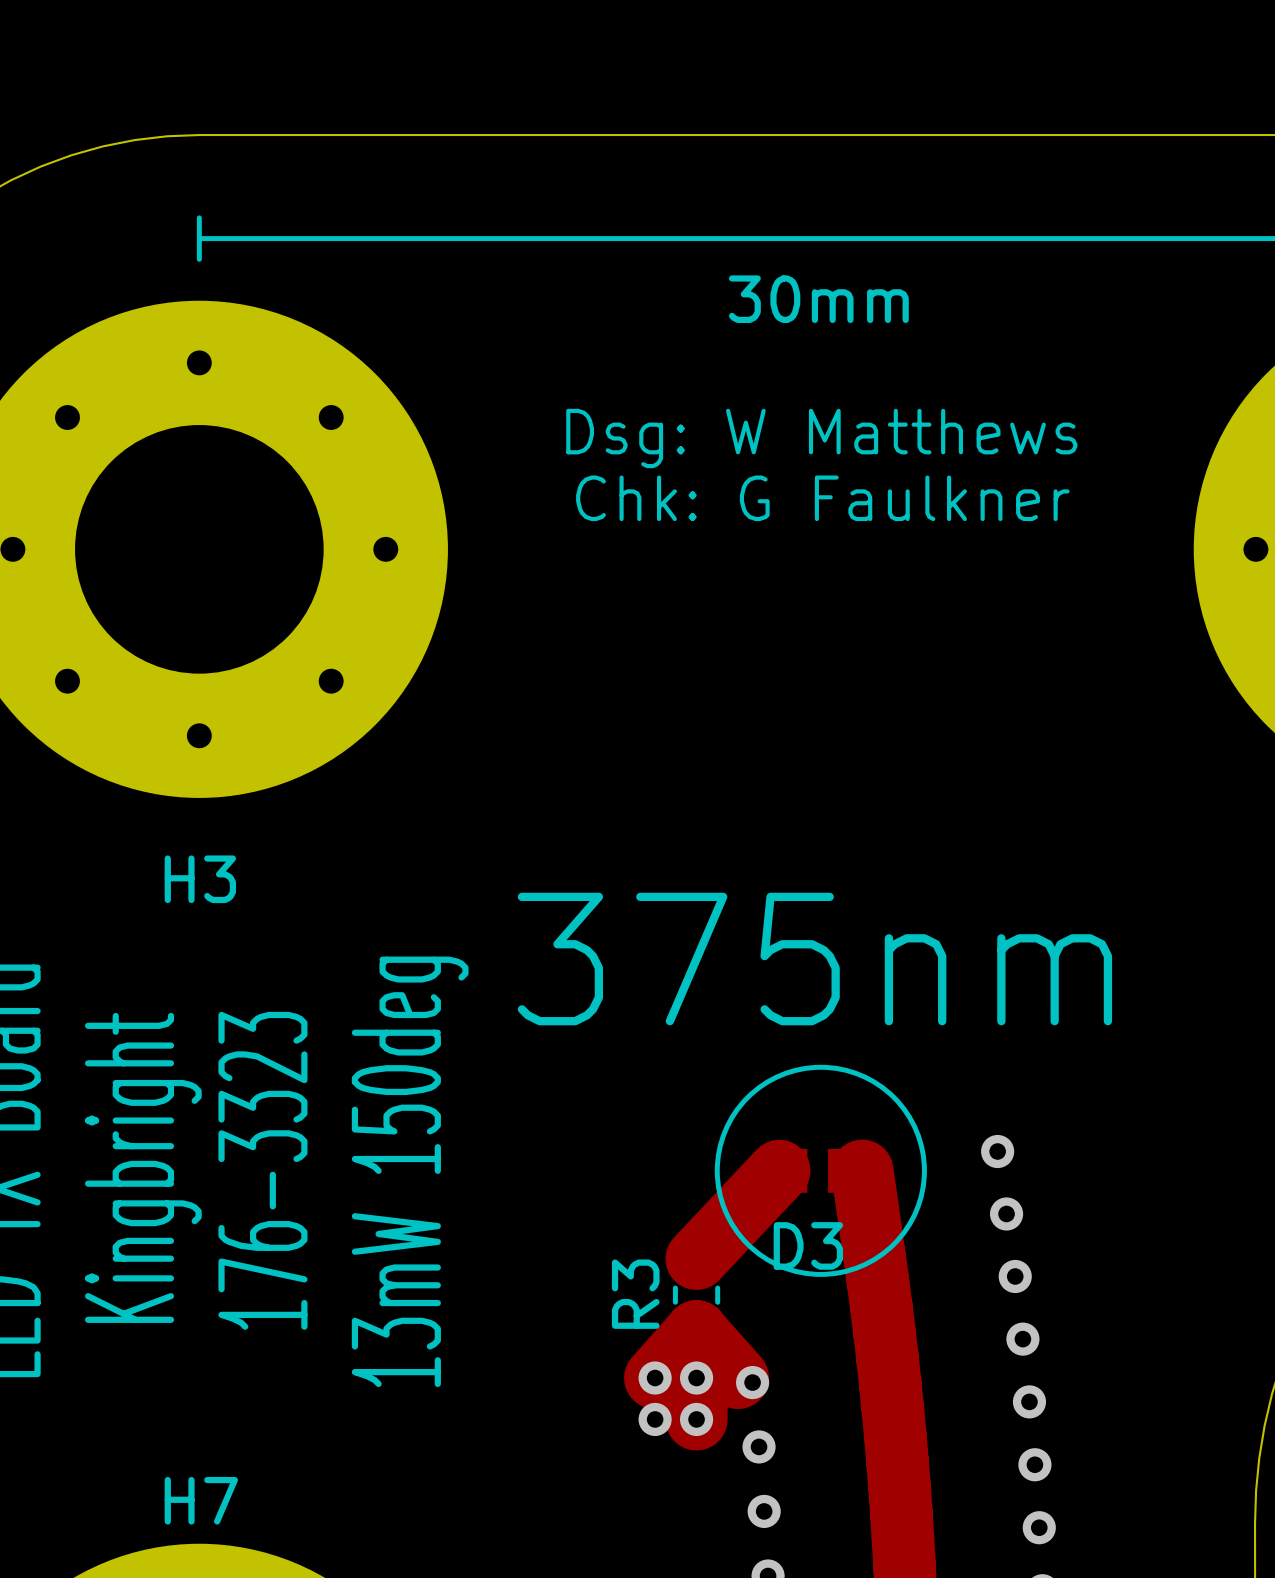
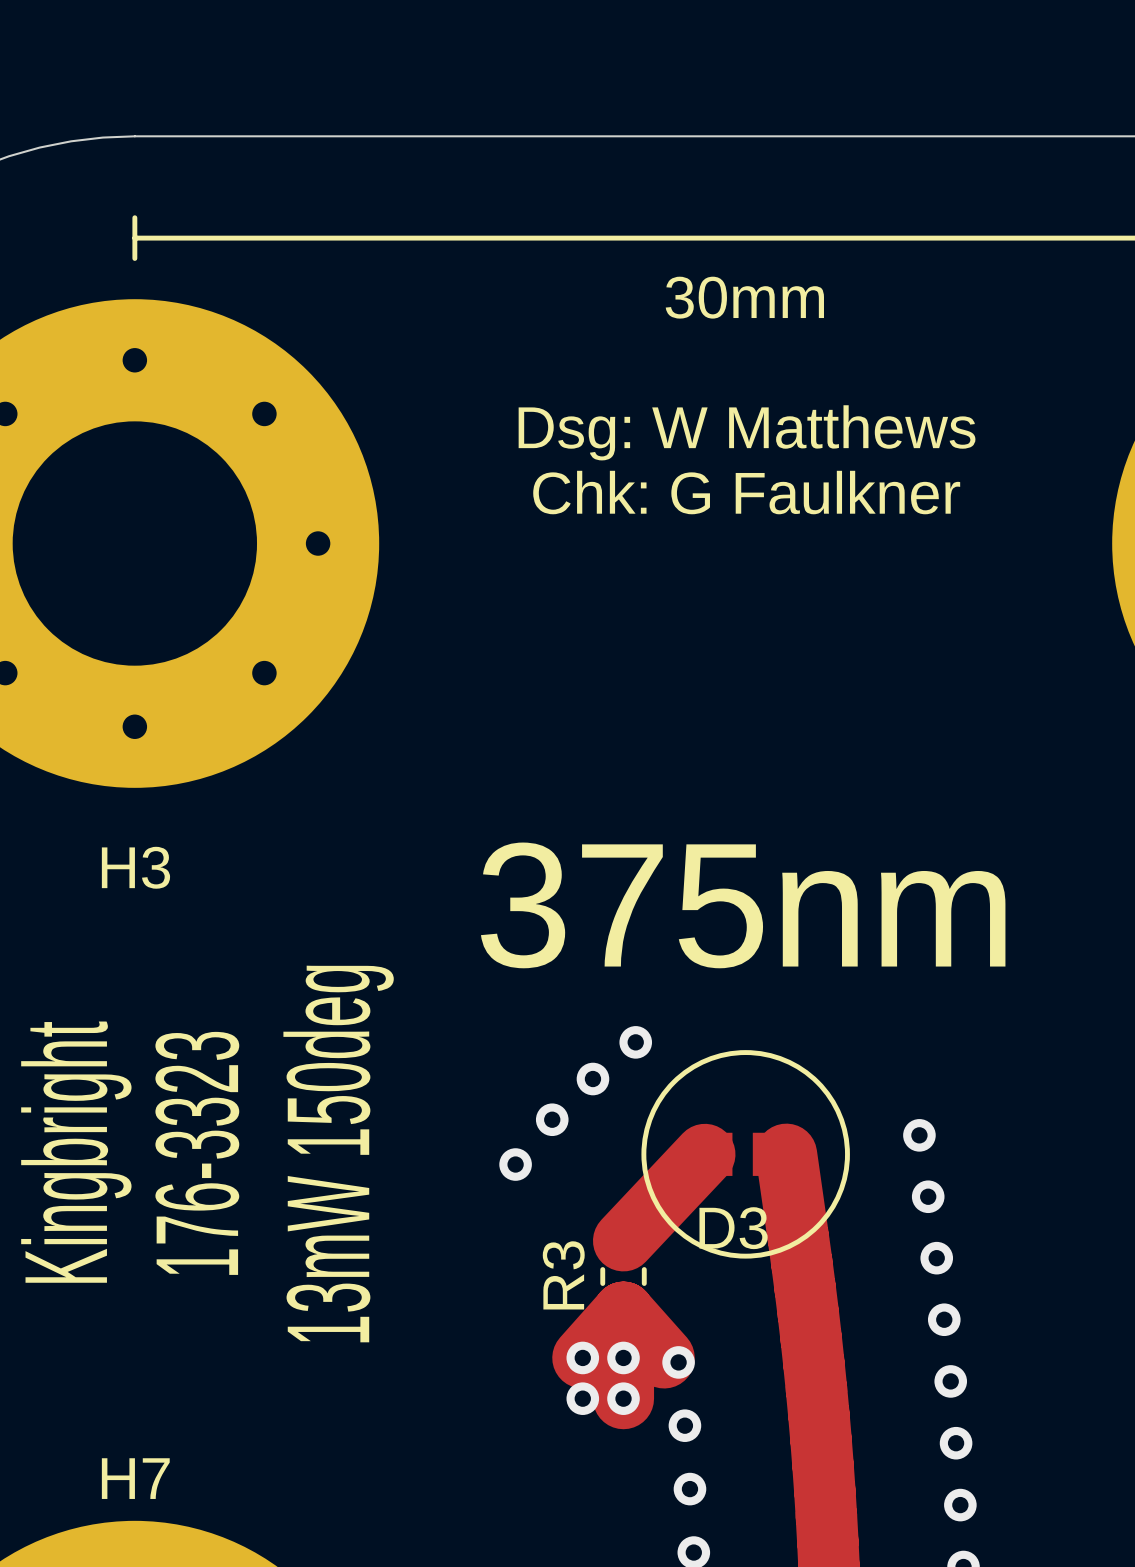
text position: 375nm (814, 959) -> 375nm (743, 905)
via: none -> (635, 1042)
via: none -> (592, 1079)
via: none -> (552, 1119)
via: none -> (515, 1164)

